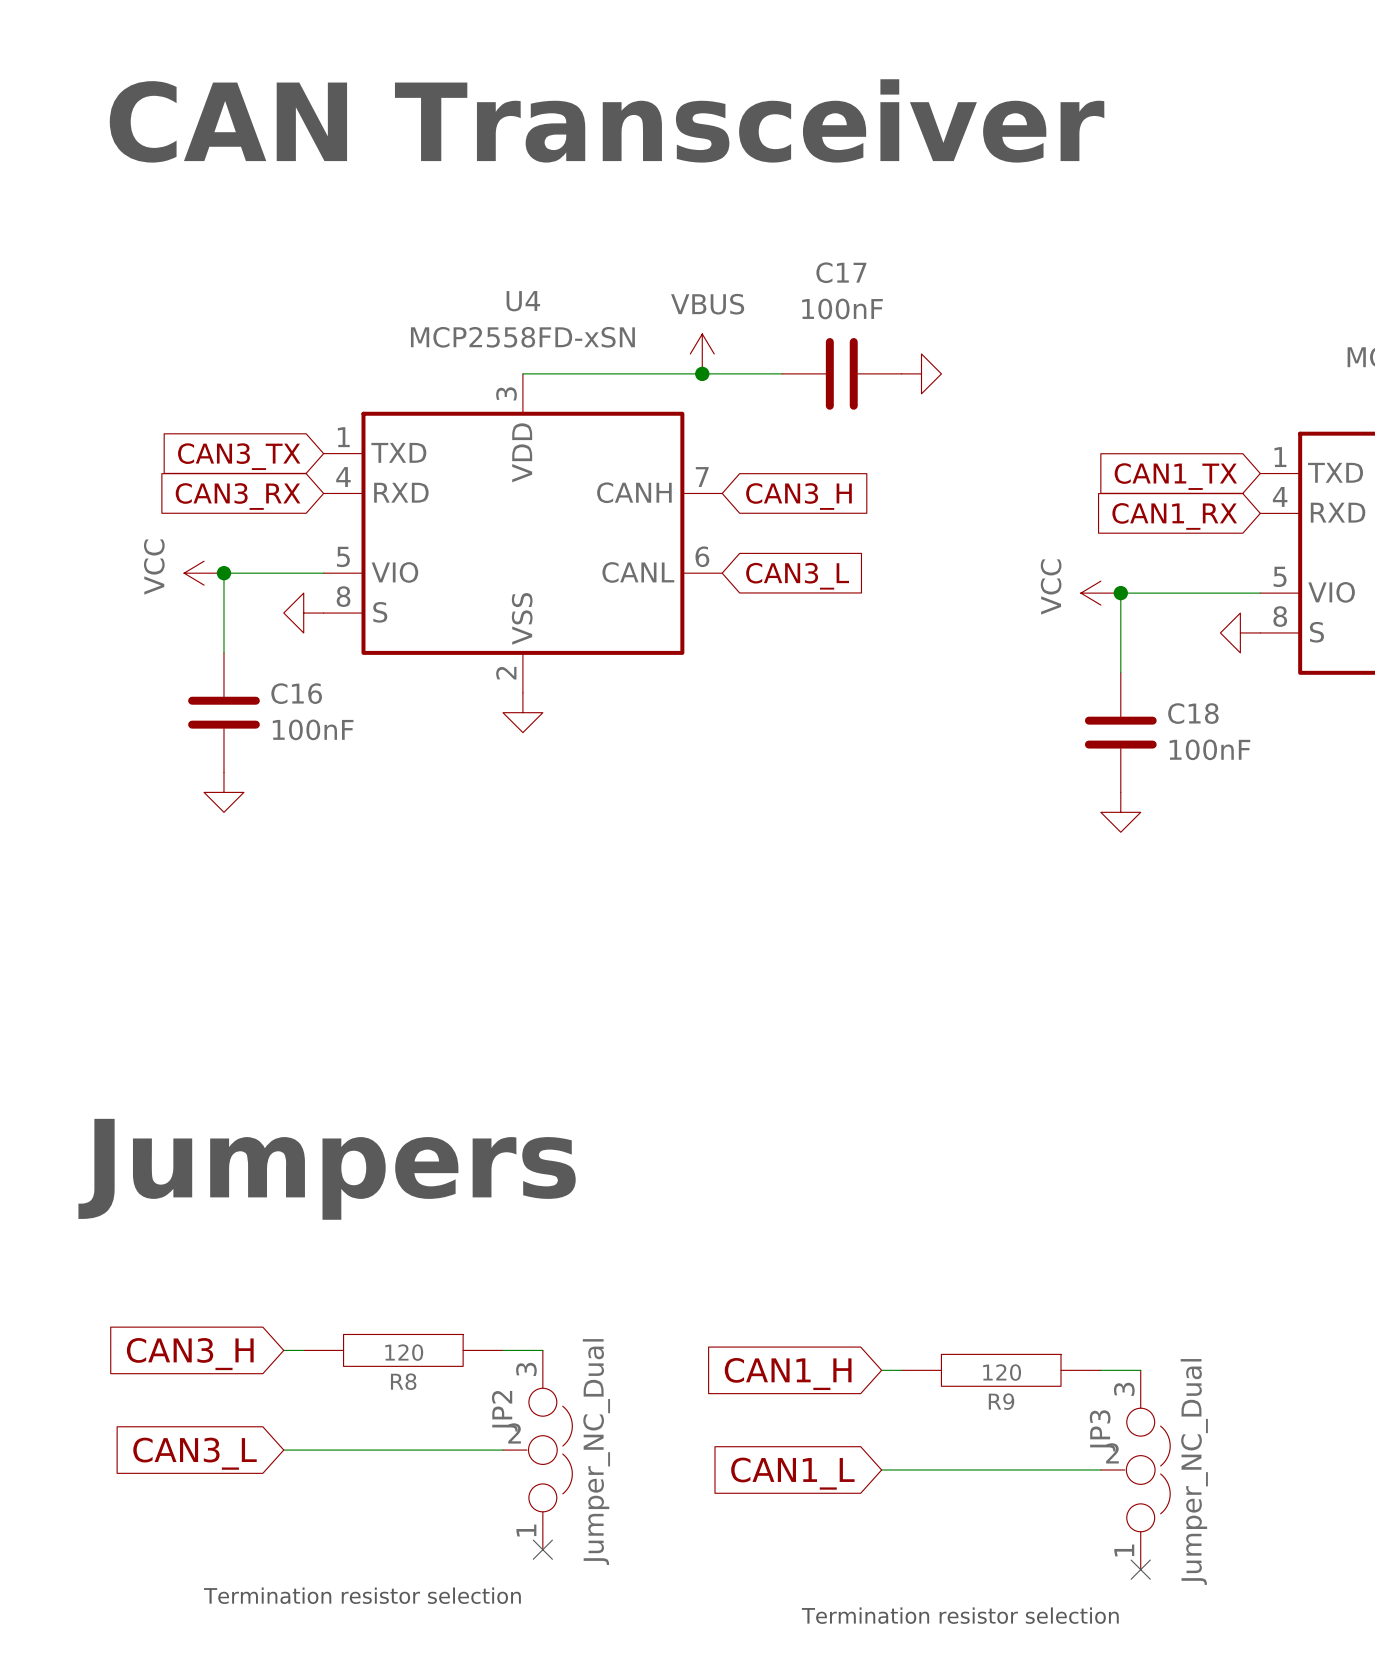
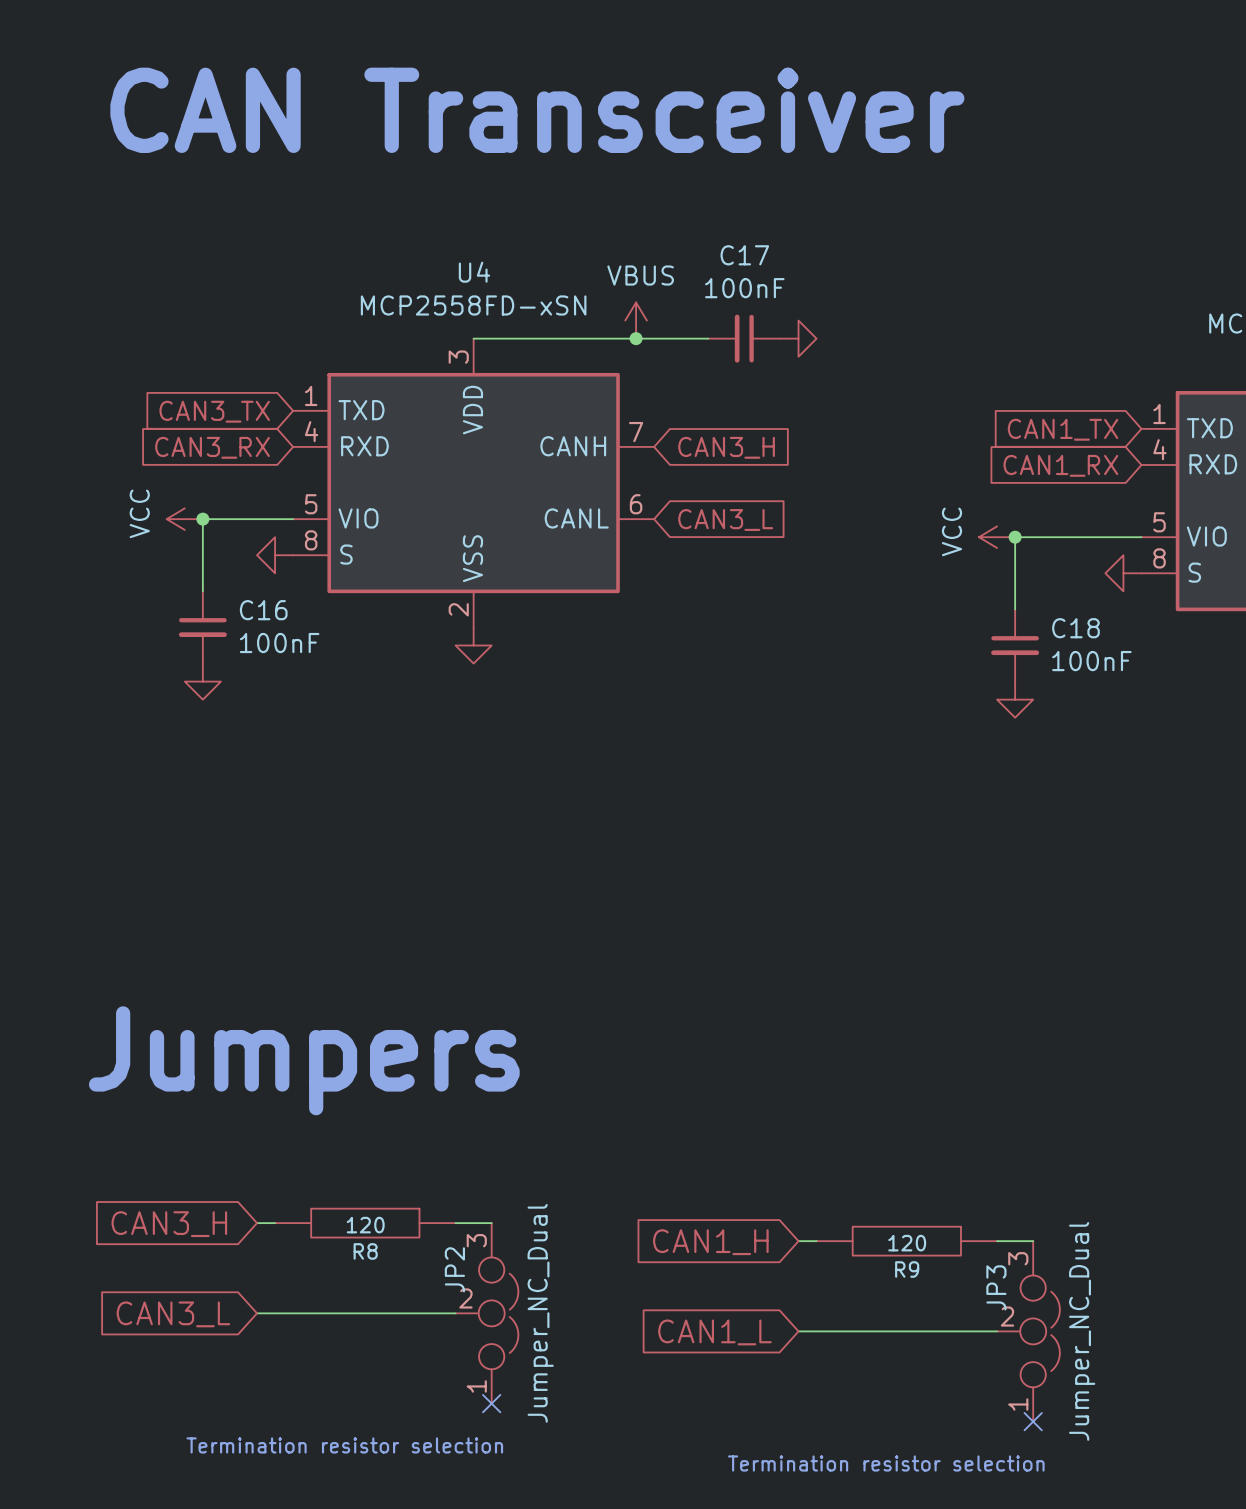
C17 symbol: [782, 338, 902, 410] -> [708, 314, 781, 363]
power symbol position: (921, 373) -> (798, 338)
C16 symbol: [188, 652, 260, 773] -> [178, 591, 227, 664]
C18 symbol: [1084, 672, 1157, 793] -> [991, 609, 1040, 682]
power symbol position: (223, 792) -> (202, 681)
power symbol position: (1120, 812) -> (1015, 699)

